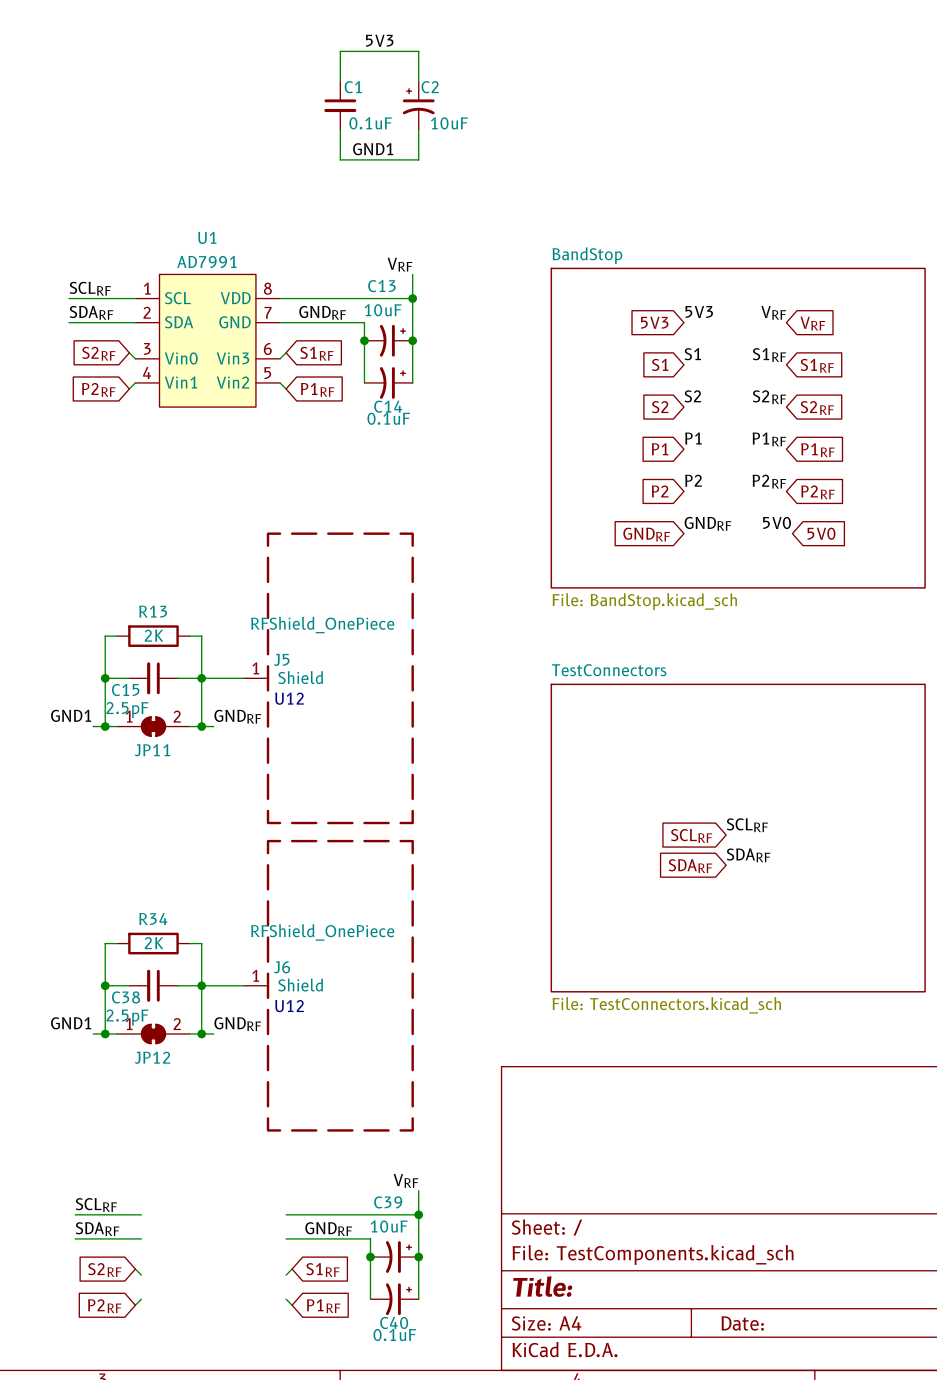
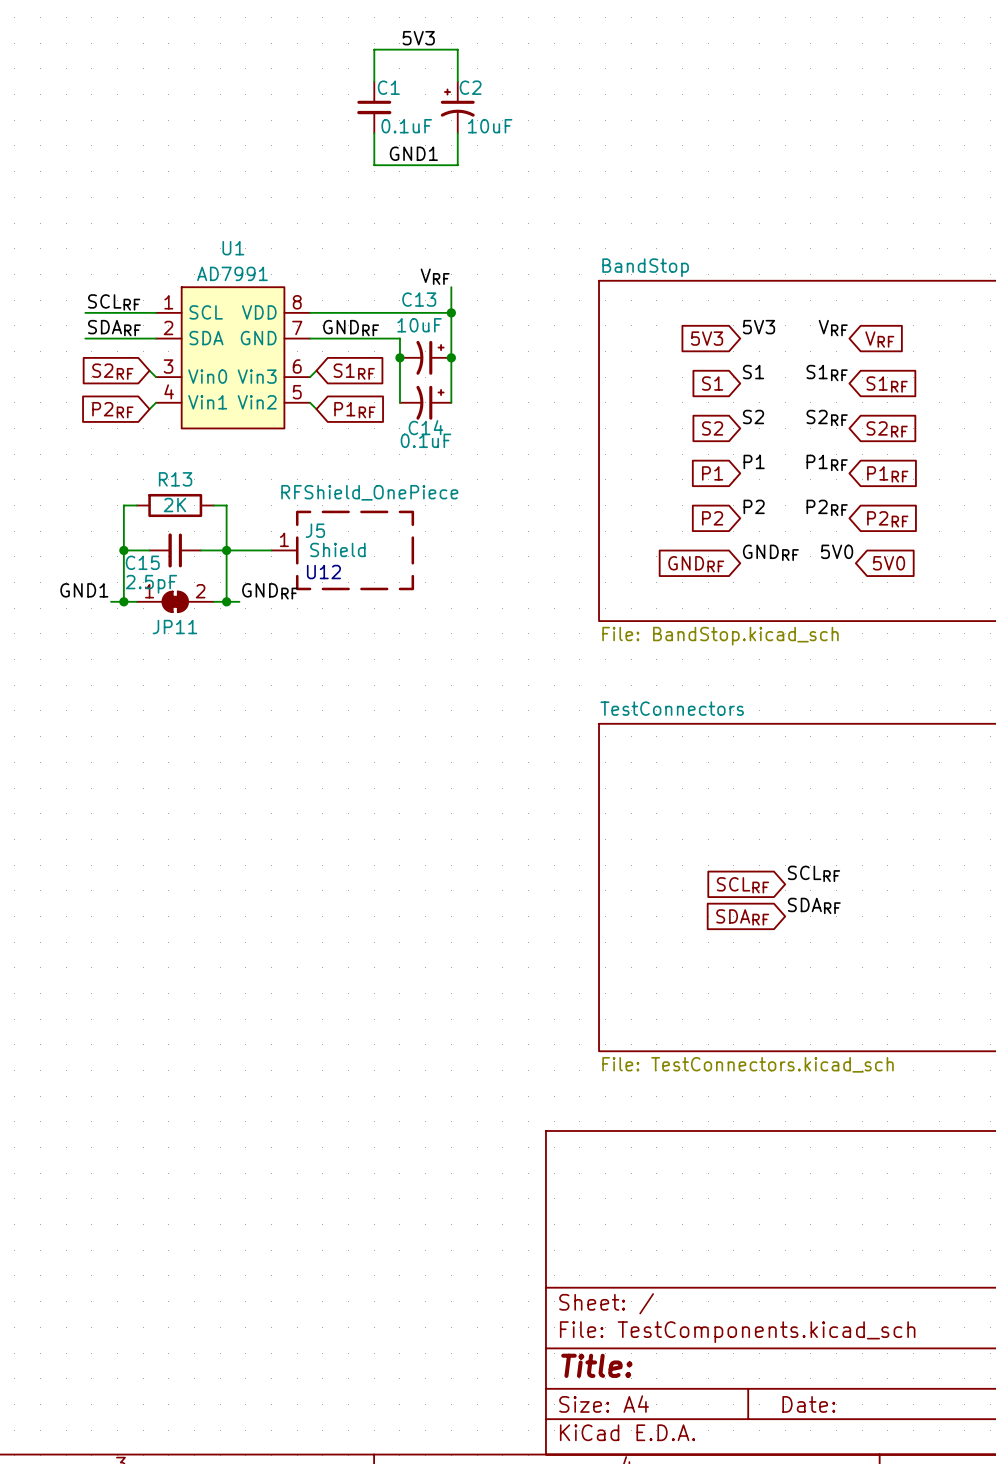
junction: none -> (123, 550)
junction: none -> (226, 550)
J5 symbol: [243, 532, 414, 825] -> [271, 510, 415, 591]
junction: none -> (123, 601)
junction: none -> (226, 601)
wire: (117, 636) (105, 636) (105, 726) -> (136, 505) (123, 505) (123, 601)
R13 position: (153, 636) -> (175, 505)
wire: (189, 636) (201, 636) (201, 726) -> (213, 505) (226, 505) (226, 601)
wire: (105, 678) (129, 678) -> (123, 550) (149, 550)
junction: (105, 678) -> none
C15 position: (153, 678) -> (175, 550)
wire: (177, 678) (243, 678) -> (200, 550) (271, 550)
junction: (201, 678) -> none
text position: U12 (289, 698) -> U12 (323, 572)
label position: GND1 (71, 715) -> GND1 (84, 590)
label position: GNDRF (237, 716) -> GNDRF (270, 591)
wire: (93, 726) (117, 726) -> (111, 601) (136, 601)
junction: (105, 726) -> none
JP11 position: (153, 726) -> (175, 601)
wire: (189, 726) (213, 726) -> (213, 601) (239, 601)
junction: (201, 726) -> none
wire: (117, 943) (105, 943) (105, 1033) -> none
R34: 2K (153, 943) -> none
wire: (189, 943) (201, 943) (201, 1033) -> none
wire: (105, 985) (129, 985) -> none
junction: (105, 985) -> none
C38: 2.5pF (153, 985) -> none
wire: (177, 985) (243, 985) -> none
junction: (201, 985) -> none
J6: RFShield_OnePiece (328, 985) -> none
text: U12 (289, 1006) -> none
label: GND1 (71, 1023) -> none
label: GNDRF (237, 1024) -> none
wire: (93, 1033) (117, 1033) -> none
junction: (105, 1033) -> none
JP12: (153, 1033) -> none
wire: (189, 1033) (213, 1033) -> none
junction: (201, 1033) -> none
label: VRF (406, 1180) -> none
wire: (418, 1190) (418, 1299) -> none
label: SCLRF (96, 1204) -> none
wire: (75, 1214) (141, 1214) -> none
wire: (286, 1214) (418, 1214) -> none
junction: (418, 1214) -> none
label: SDARF (97, 1229) -> none
label: GNDRF (328, 1229) -> none
wire: (75, 1238) (141, 1238) -> none
wire: (286, 1238) (370, 1238) (370, 1299) -> none
junction: (370, 1257) -> none
C39: 10uF (394, 1257) -> none
junction: (418, 1257) -> none
wire: (135, 1269) (141, 1275) -> none
wire: (292, 1269) (286, 1275) -> none
global label: S1RF (322, 1269) -> none
global label: S2RF (104, 1270) -> none
wire: (141, 1299) (135, 1305) -> none
wire: (286, 1299) (292, 1305) -> none
C40: 0.1uF (394, 1299) -> none
global label: P2RF (104, 1306) -> none
global label: P1RF (323, 1306) -> none

